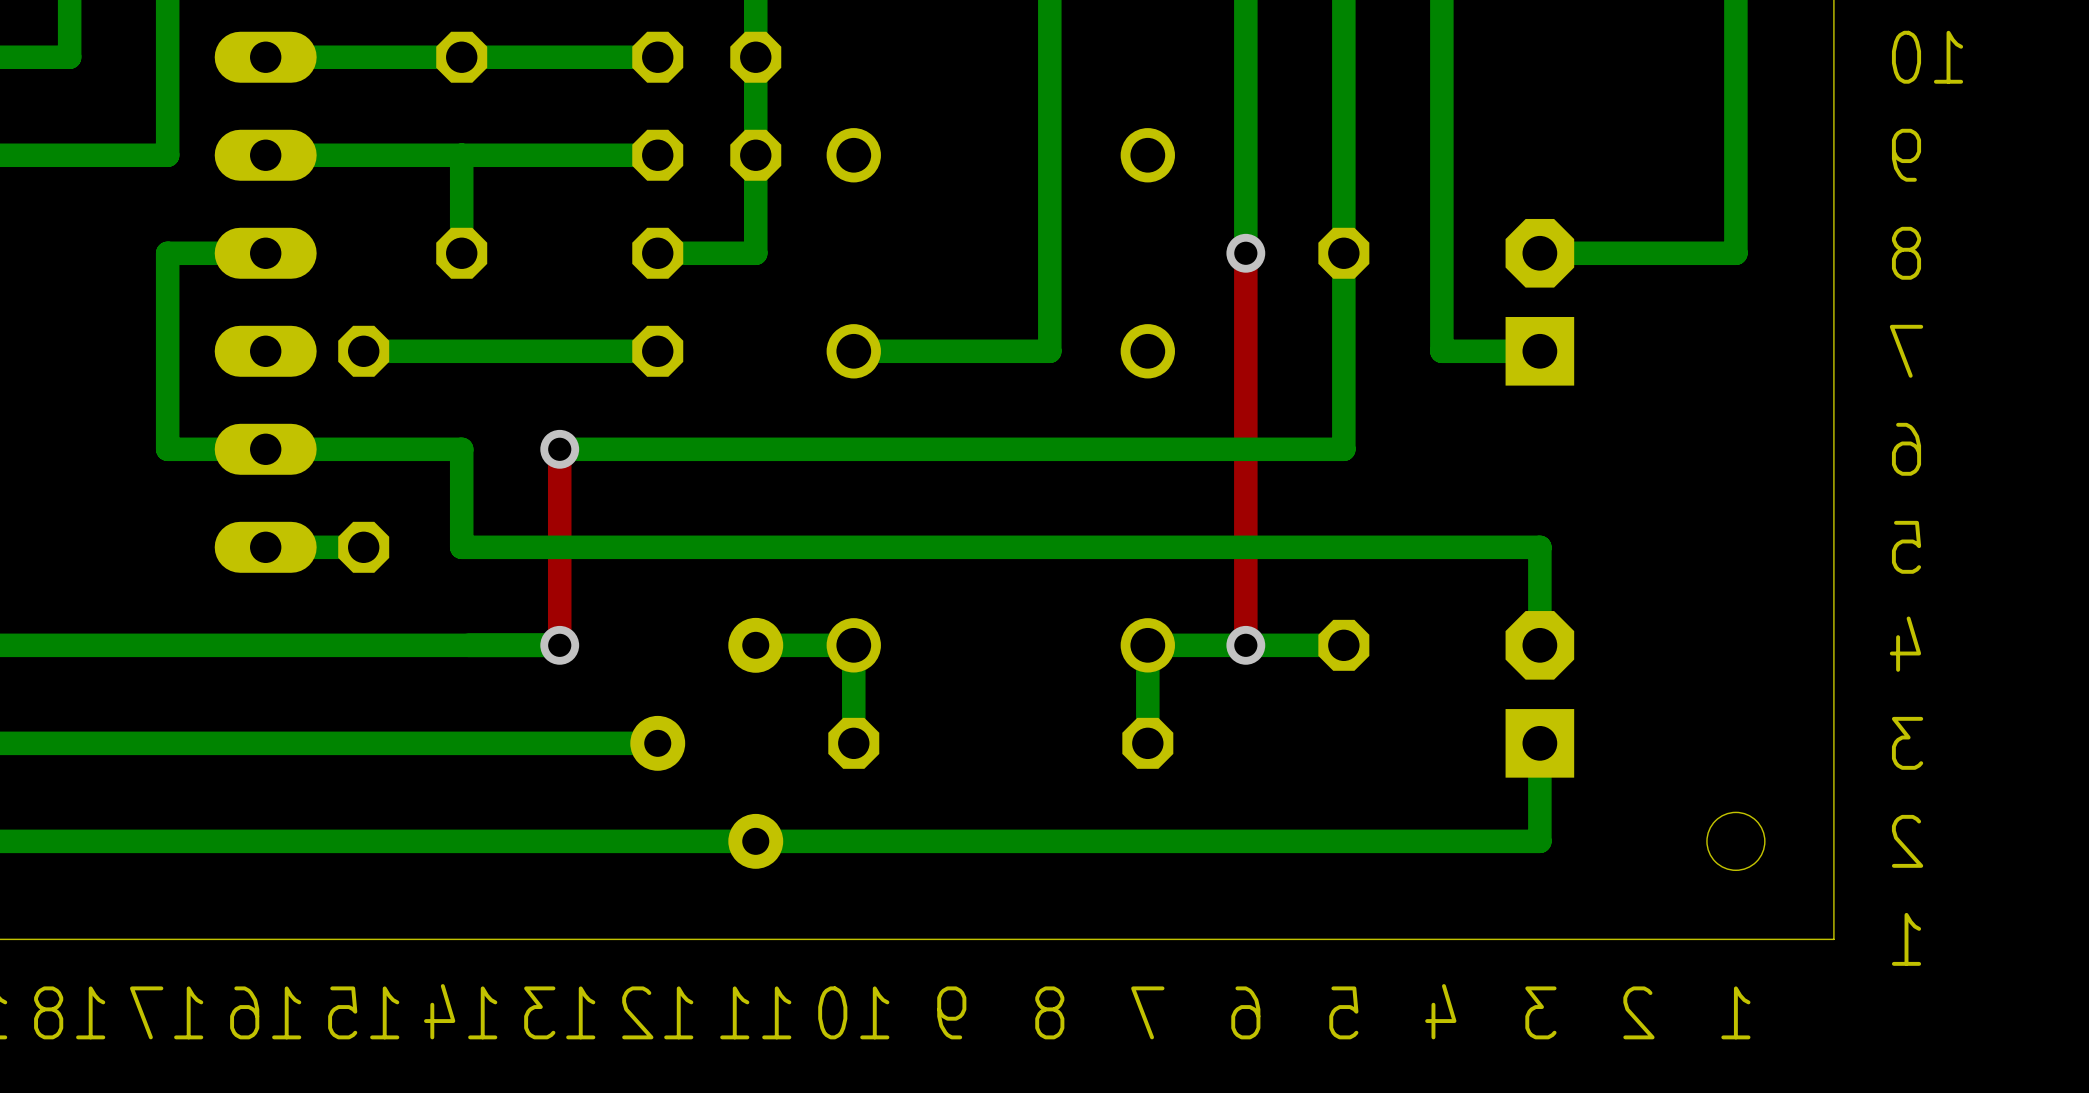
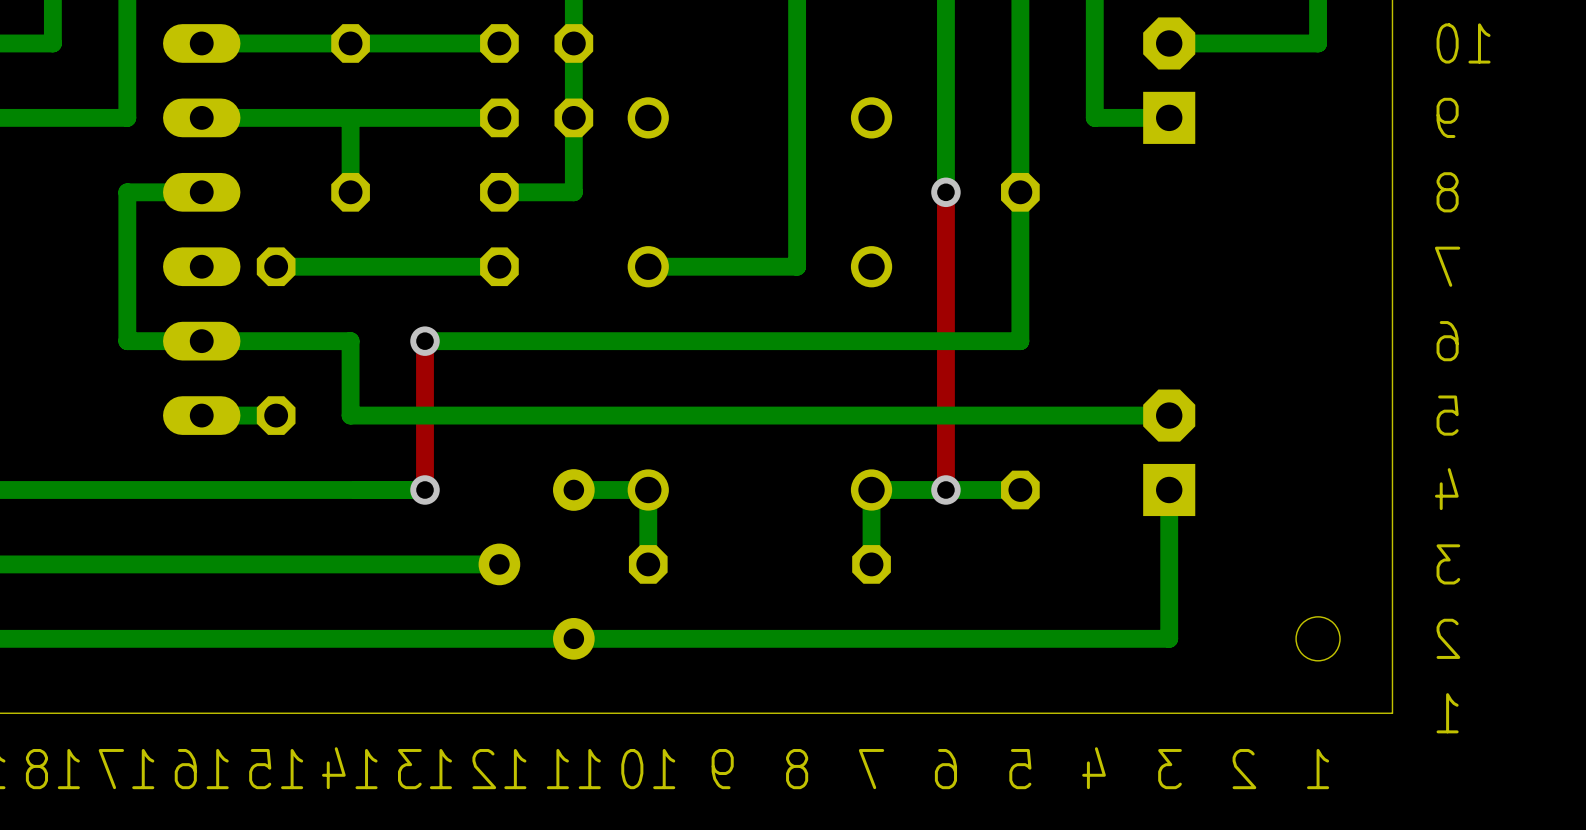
bottom track: (1735, 57) (1735, 253) (1539, 253) -> (1318, 43) (1169, 43)
part: none -> (1169, 80)
bottom track: (1441, 155) (1441, 351) (1539, 351) -> (1094, 117) (1169, 117)
part: (1539, 302) -> none
bottom track: (1539, 547) (1539, 645) -> (1169, 564) (1169, 489)
part position: (1539, 694) -> (1169, 452)

